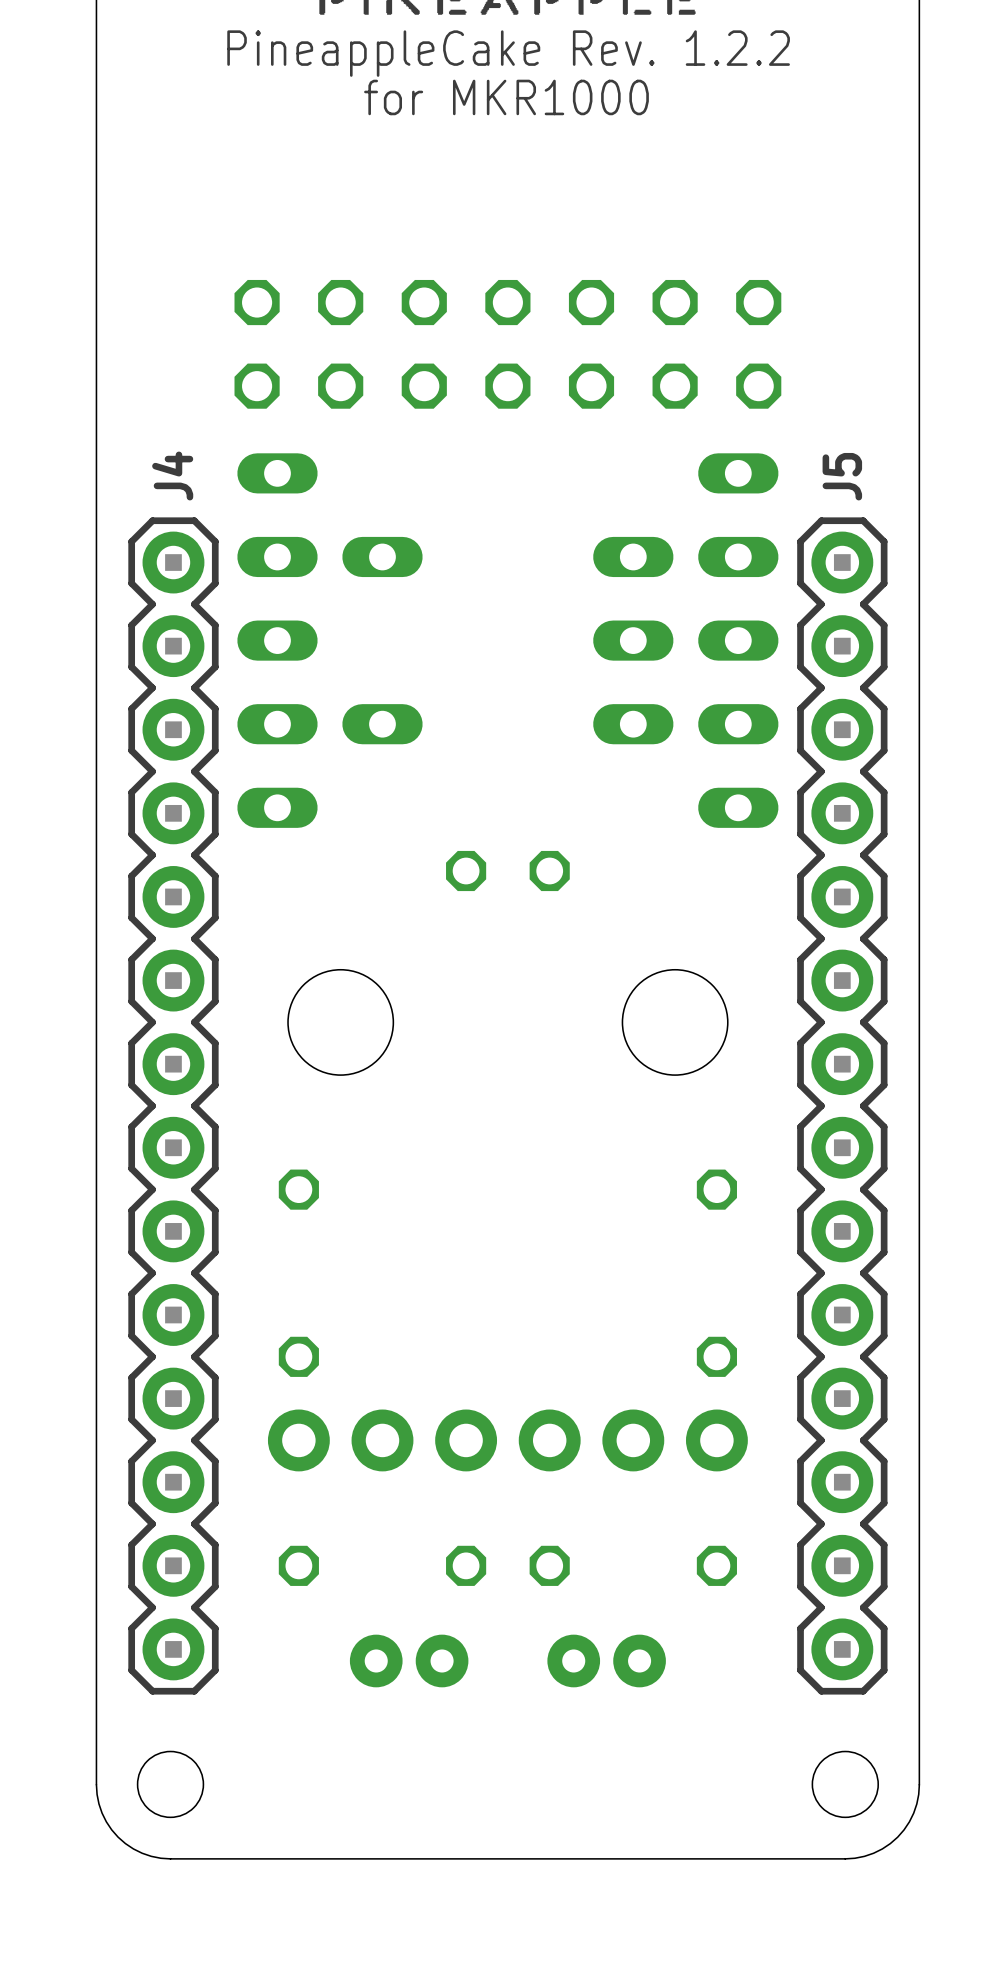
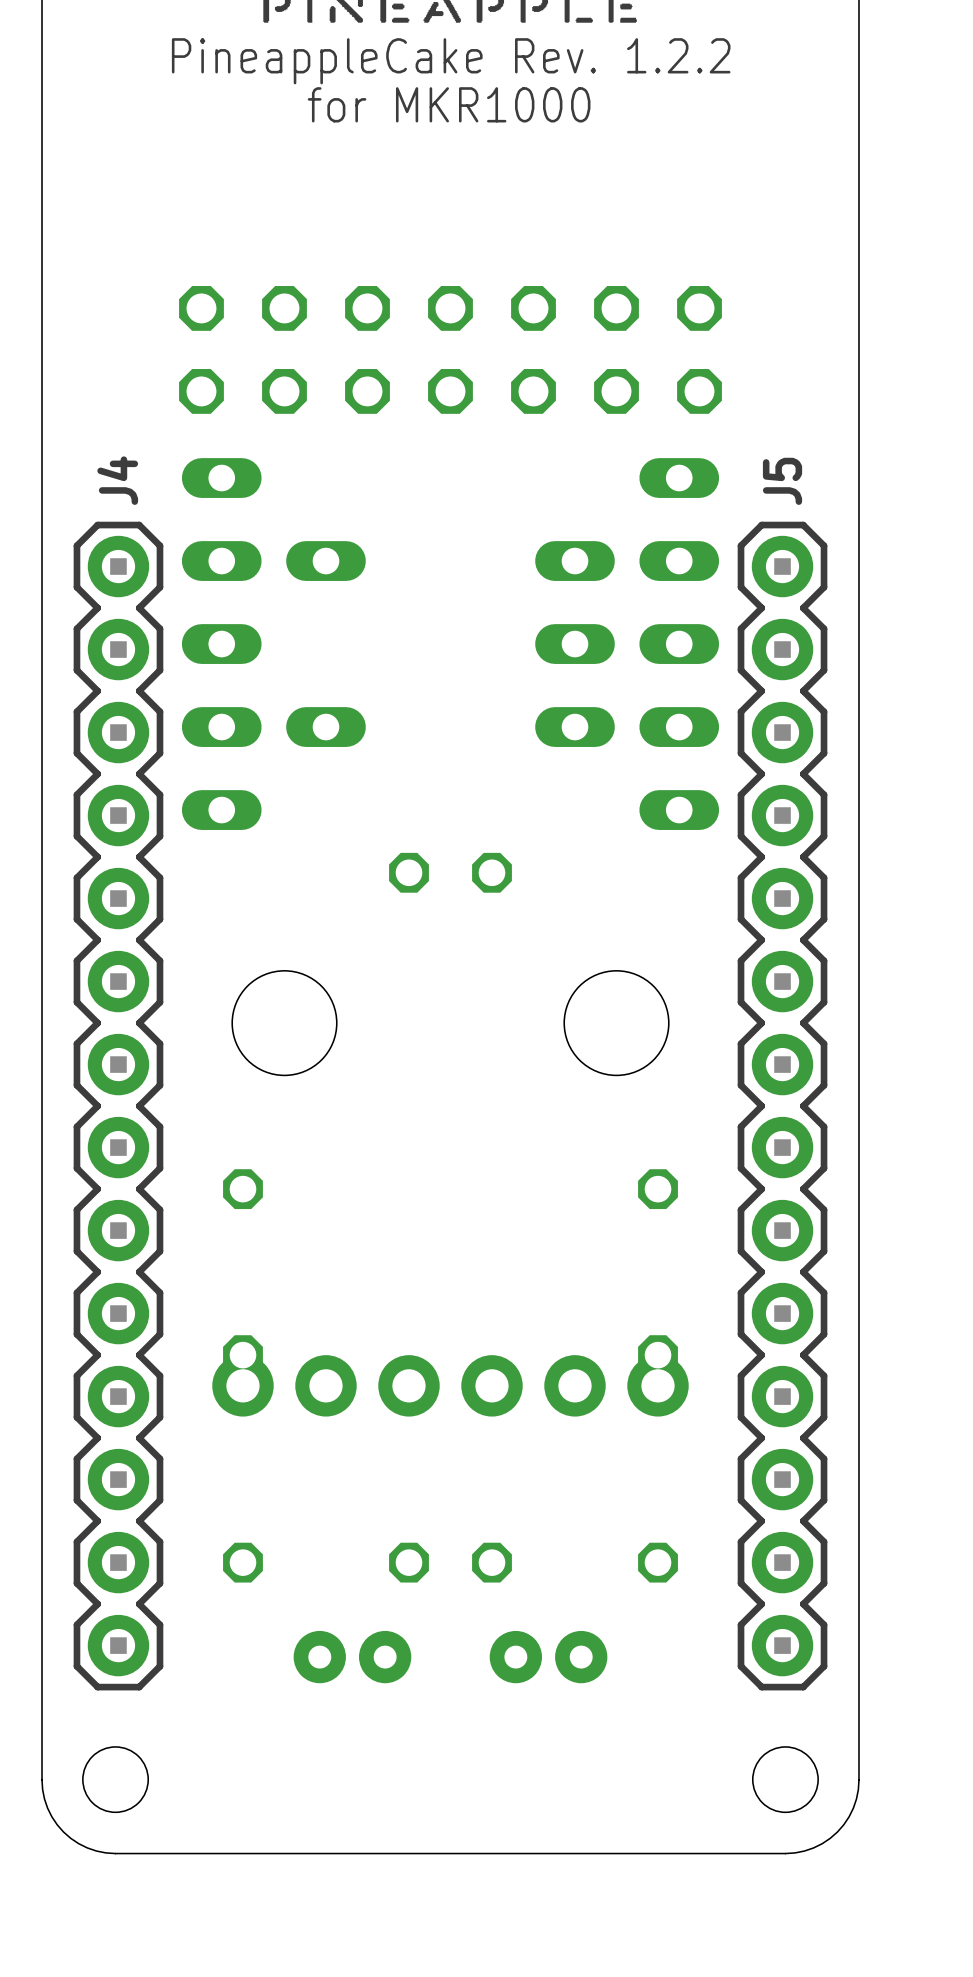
part position: (507, 1440) -> (450, 1385)

